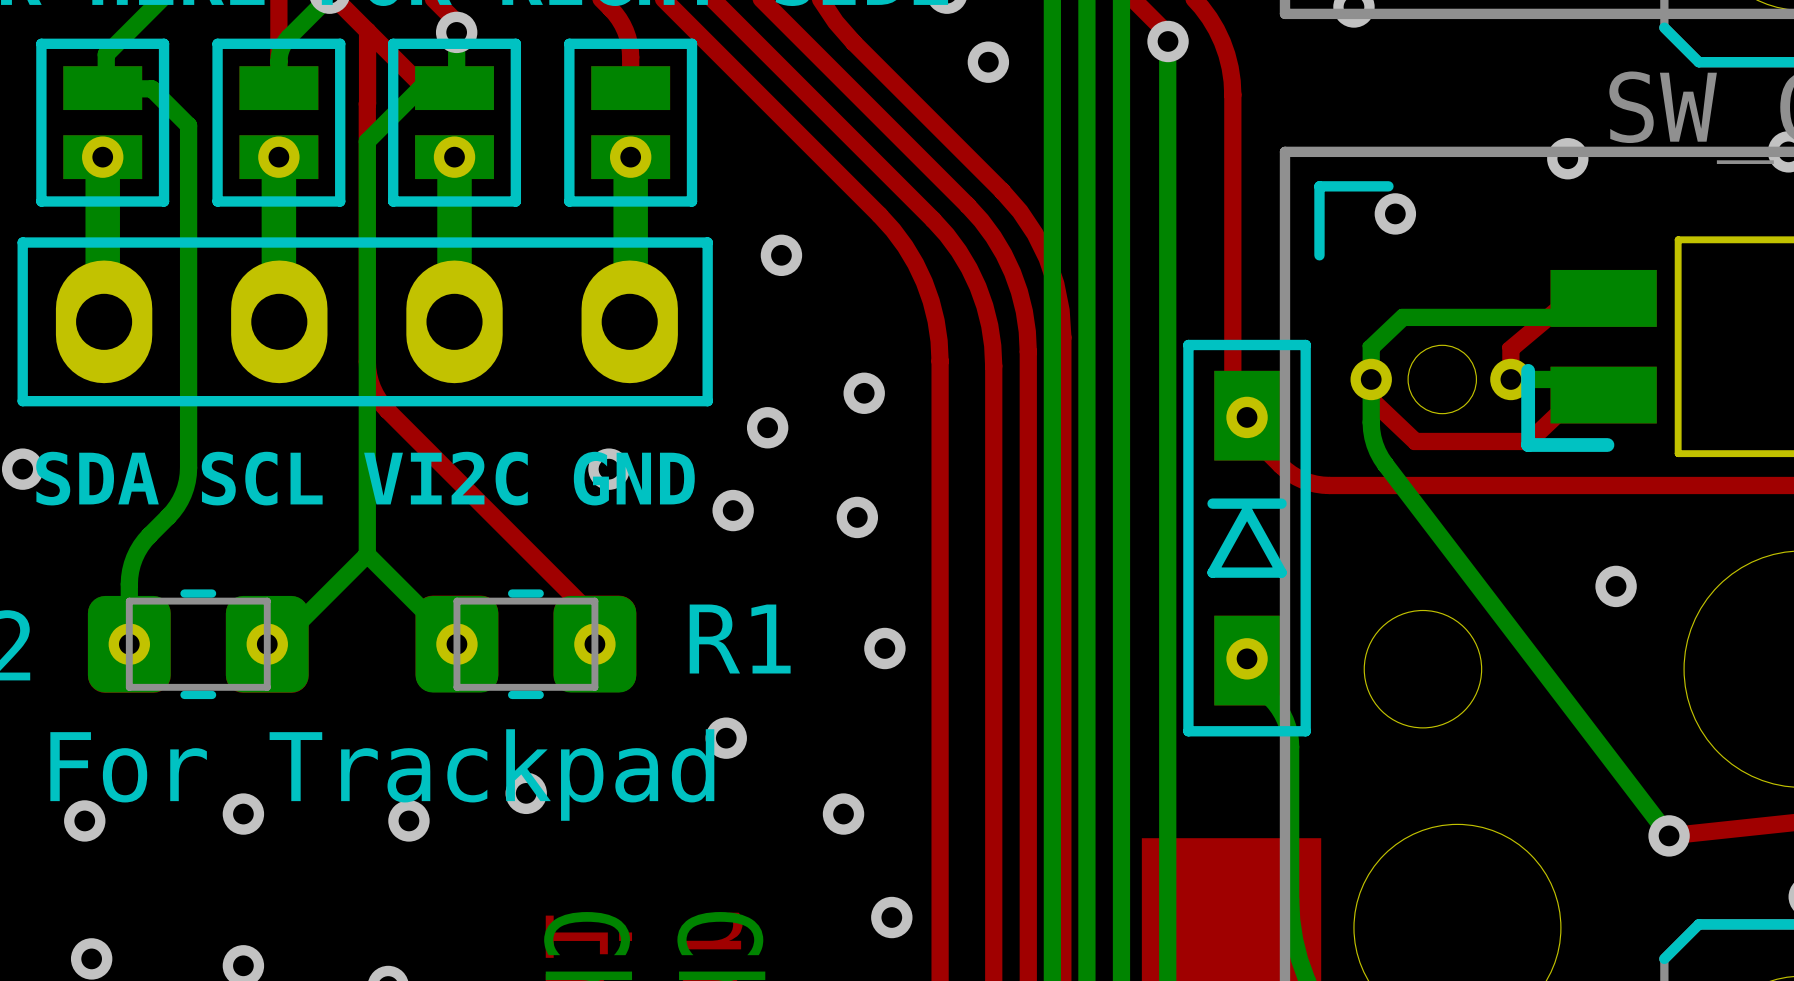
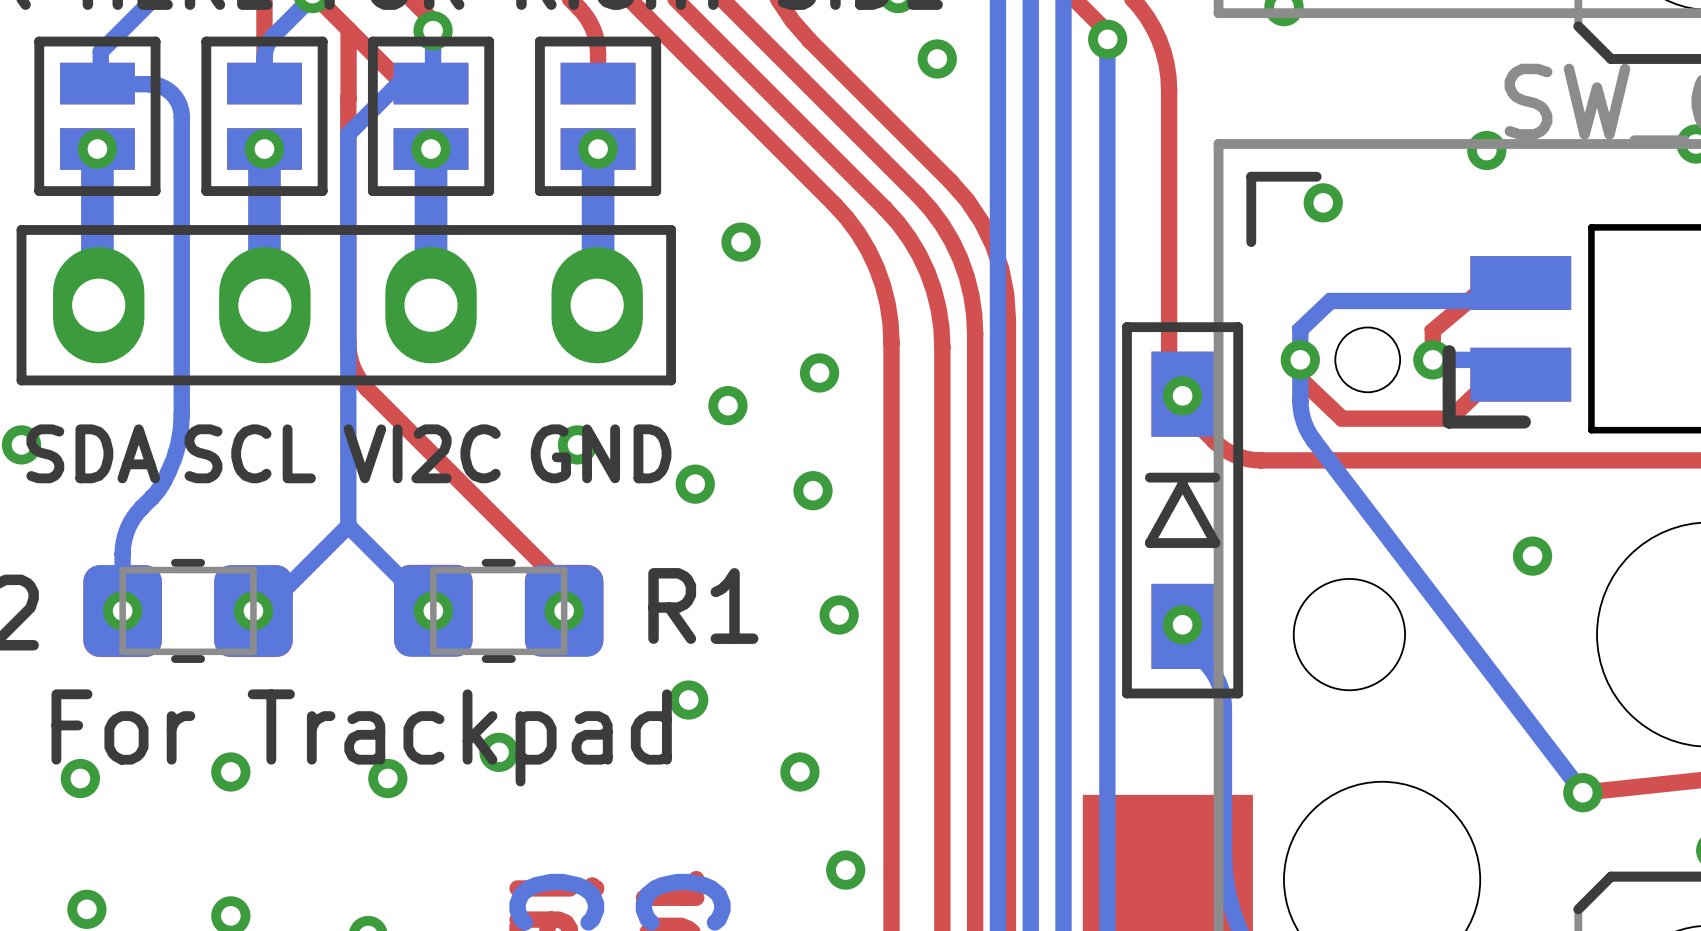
bottom track: (151, 88) (188, 125) (188, 474) (180, 500) (160, 524) -> (143, 84) (157, 85) (168, 90) (177, 100) (181, 116) (180, 429) (174, 458) (168, 472) (152, 497)

